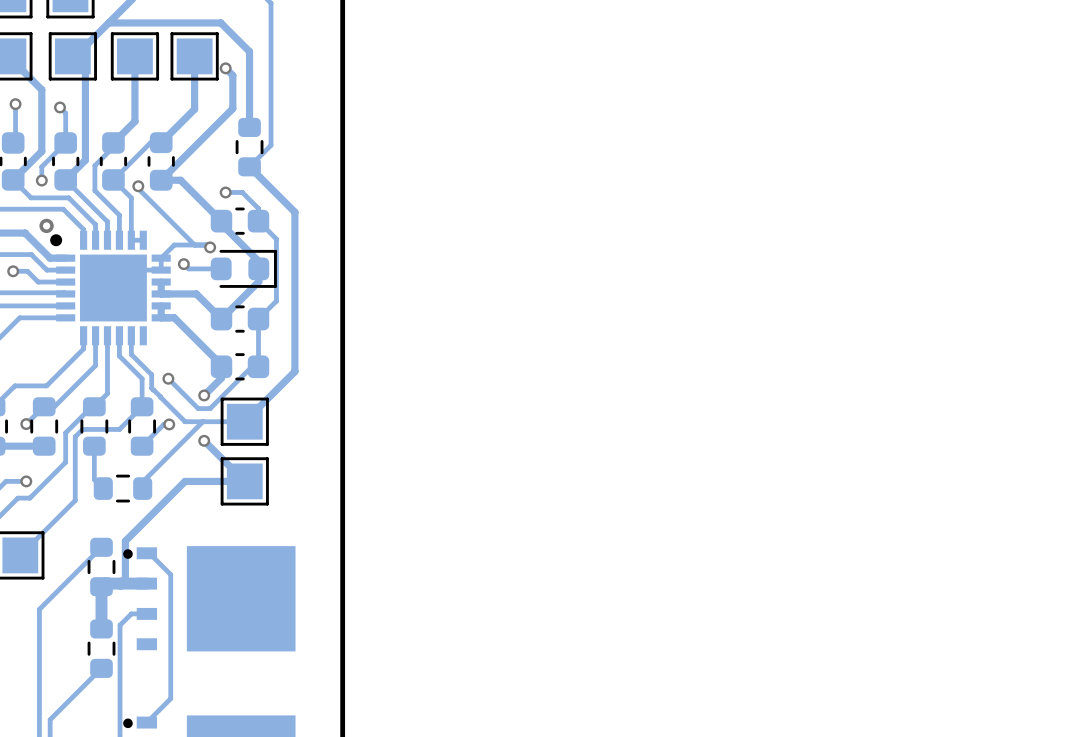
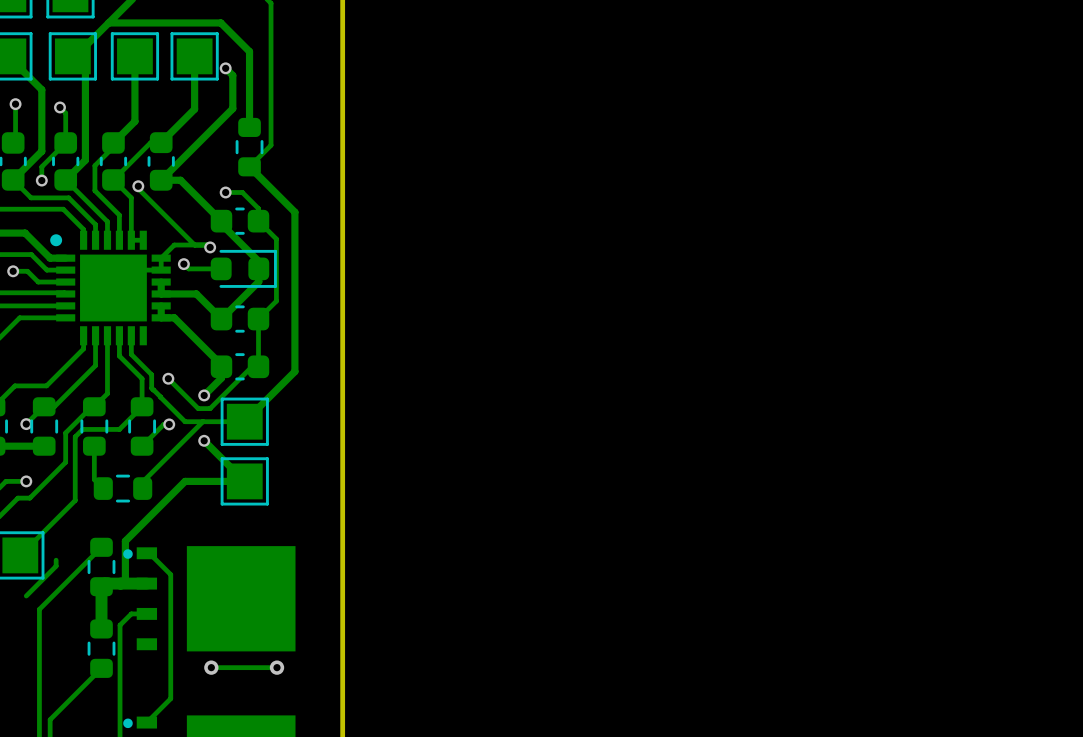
via: (46, 225) -> none
track: none -> (56, 560) (56, 566) (26, 596)
via: none -> (211, 667)
track: none -> (277, 667) (211, 667)
via: none -> (277, 667)

